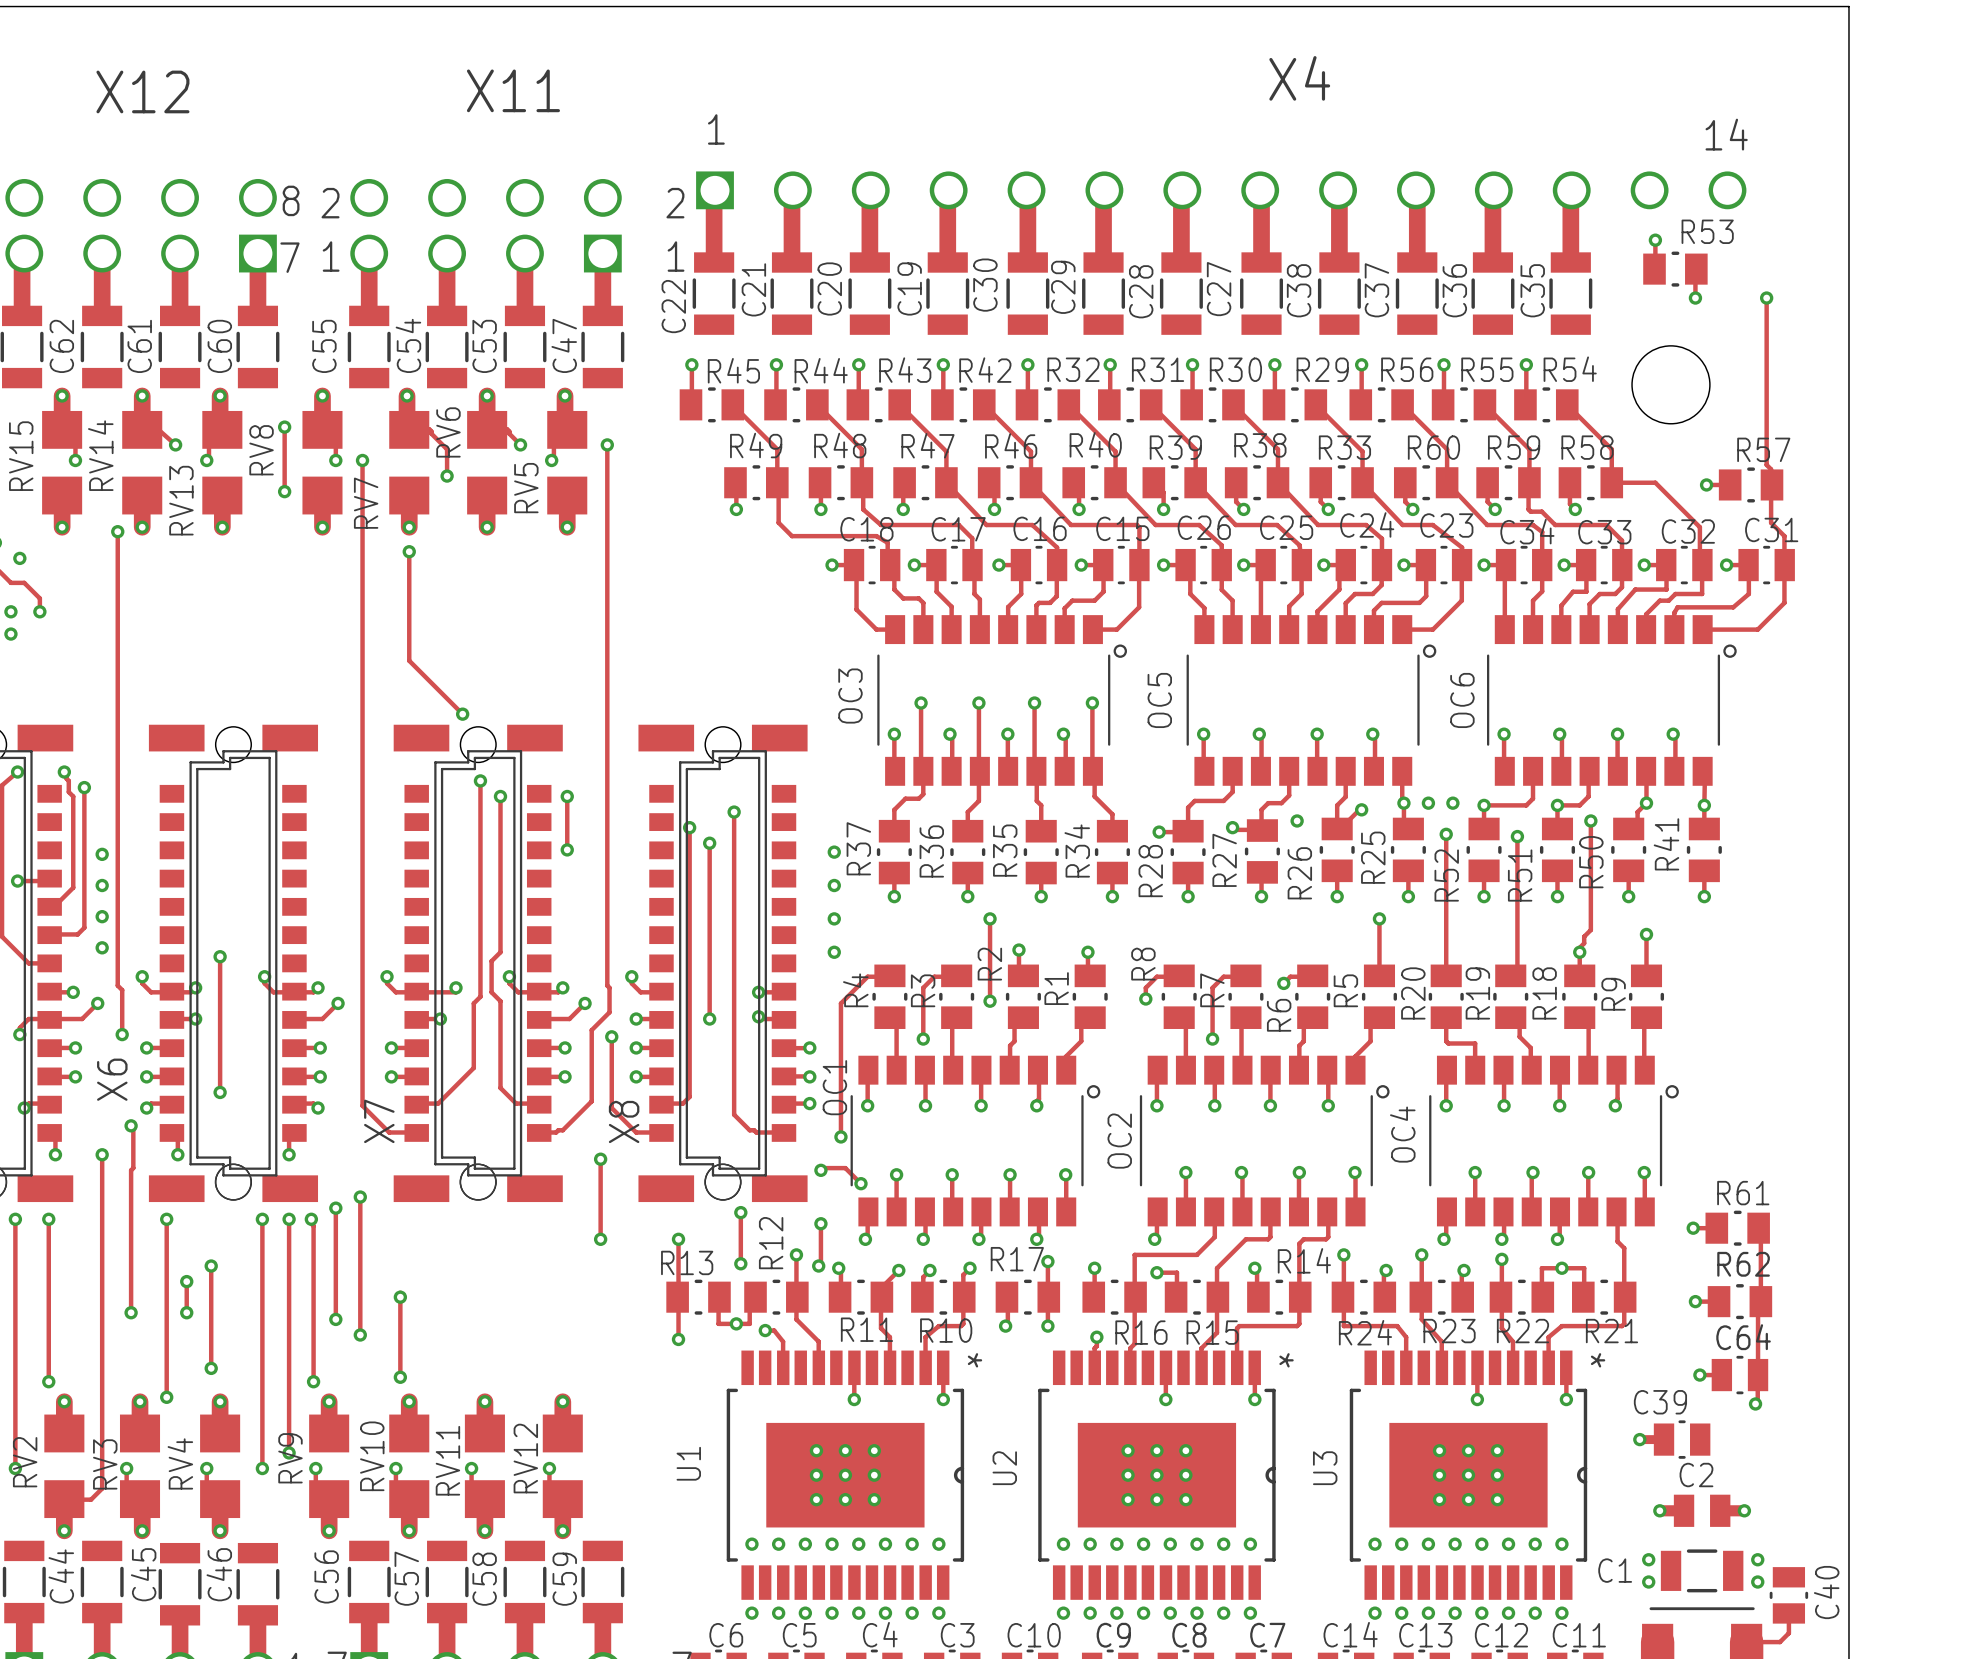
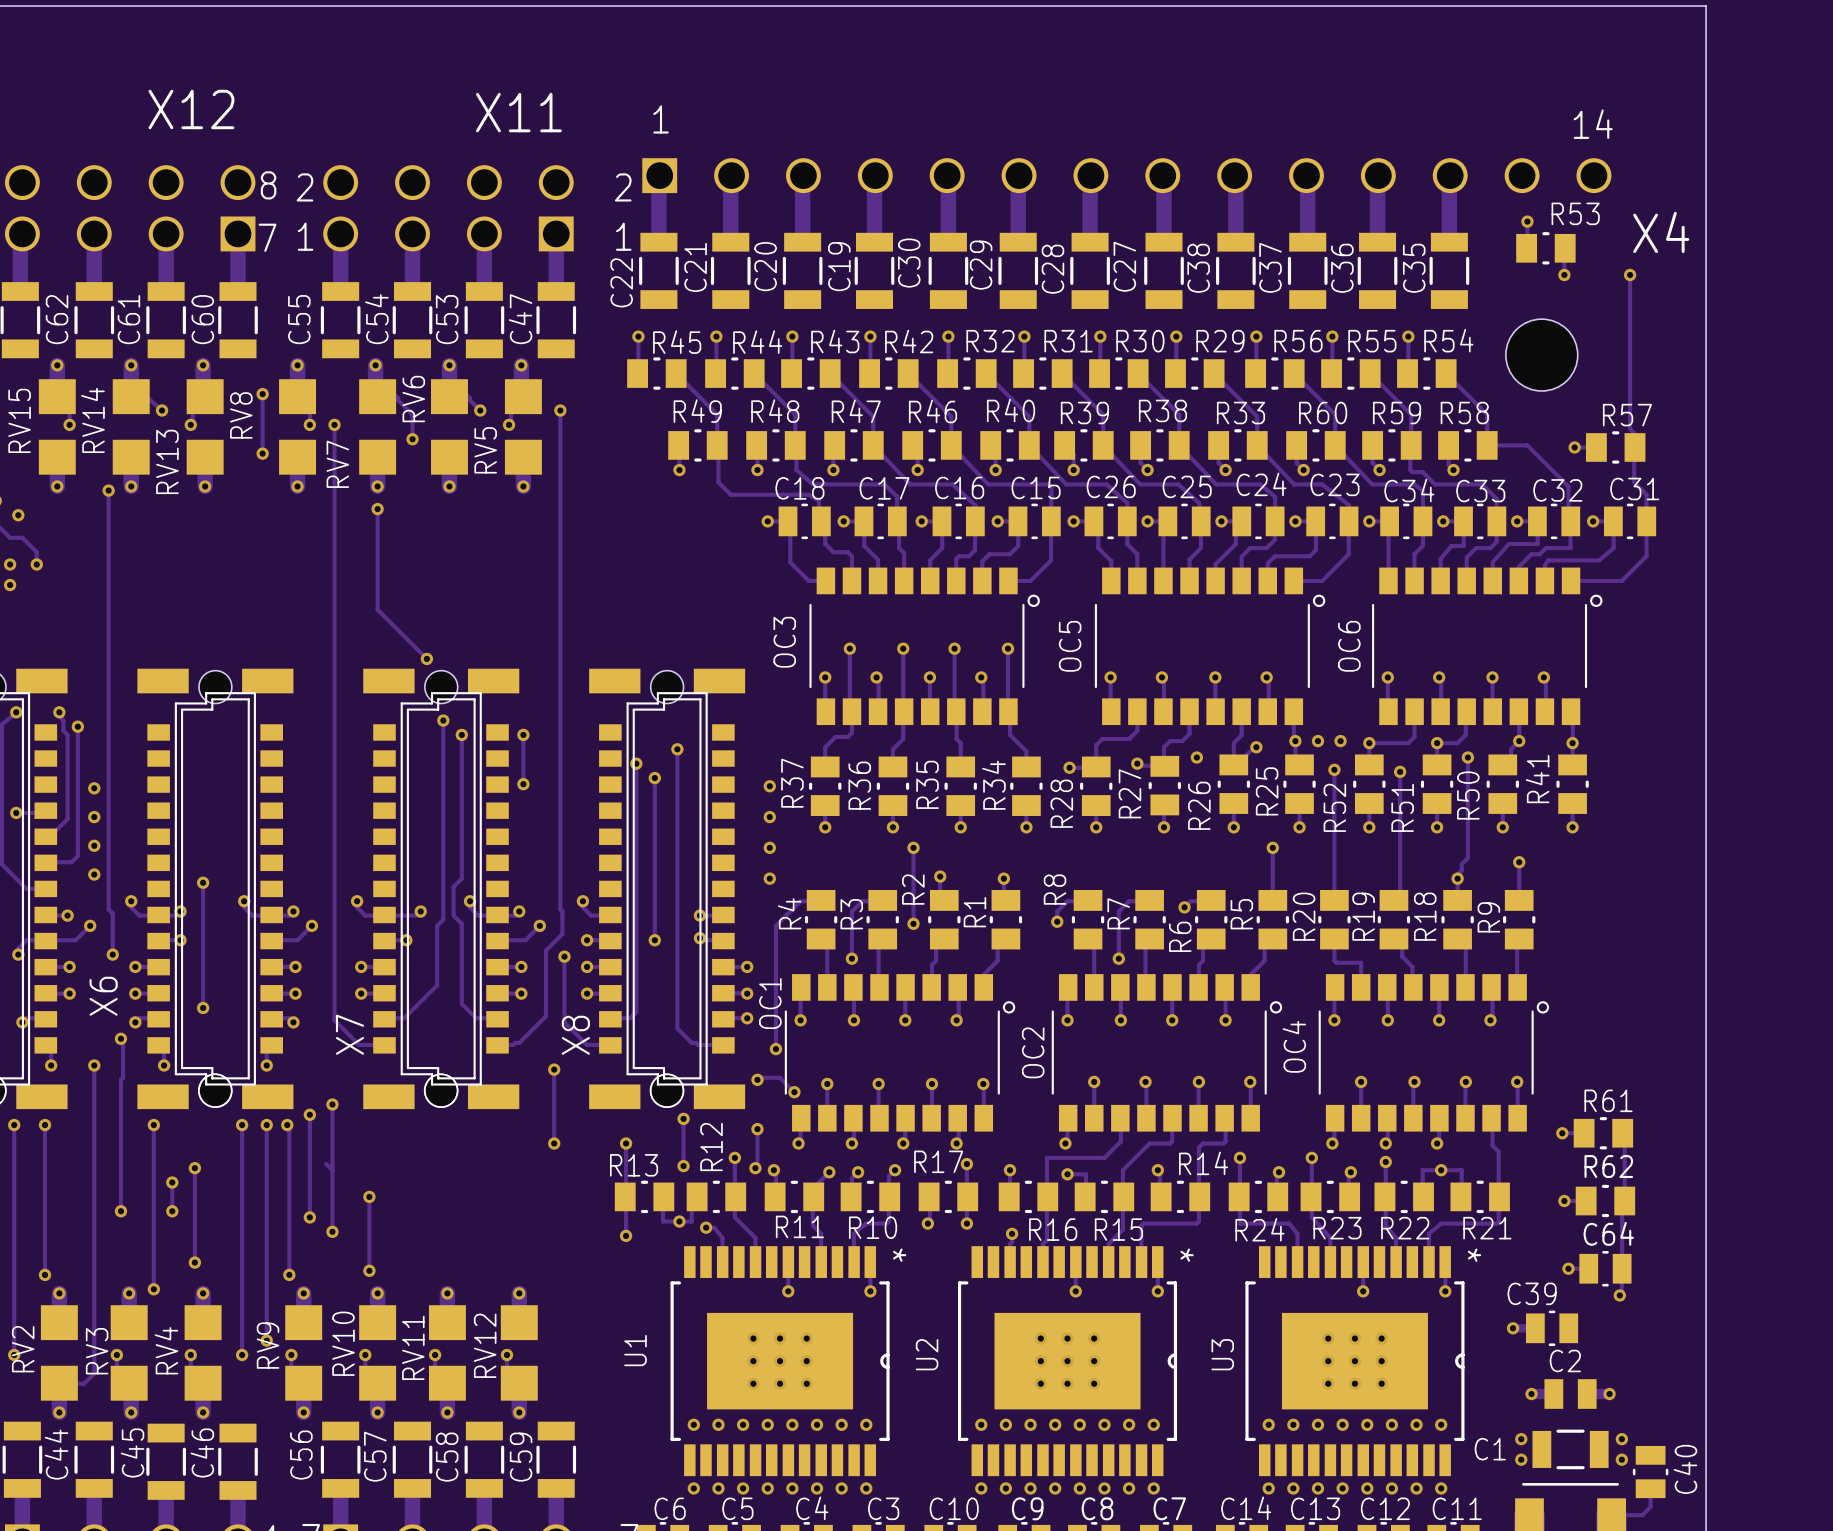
X4 name position: X4 (1299, 78) -> X4 (1661, 232)
X11 name position: X11 (513, 90) -> X11 (518, 112)
X12 name position: X12 (142, 91) -> X12 (191, 109)
track: none -> (326, 1164) (332, 1170)

